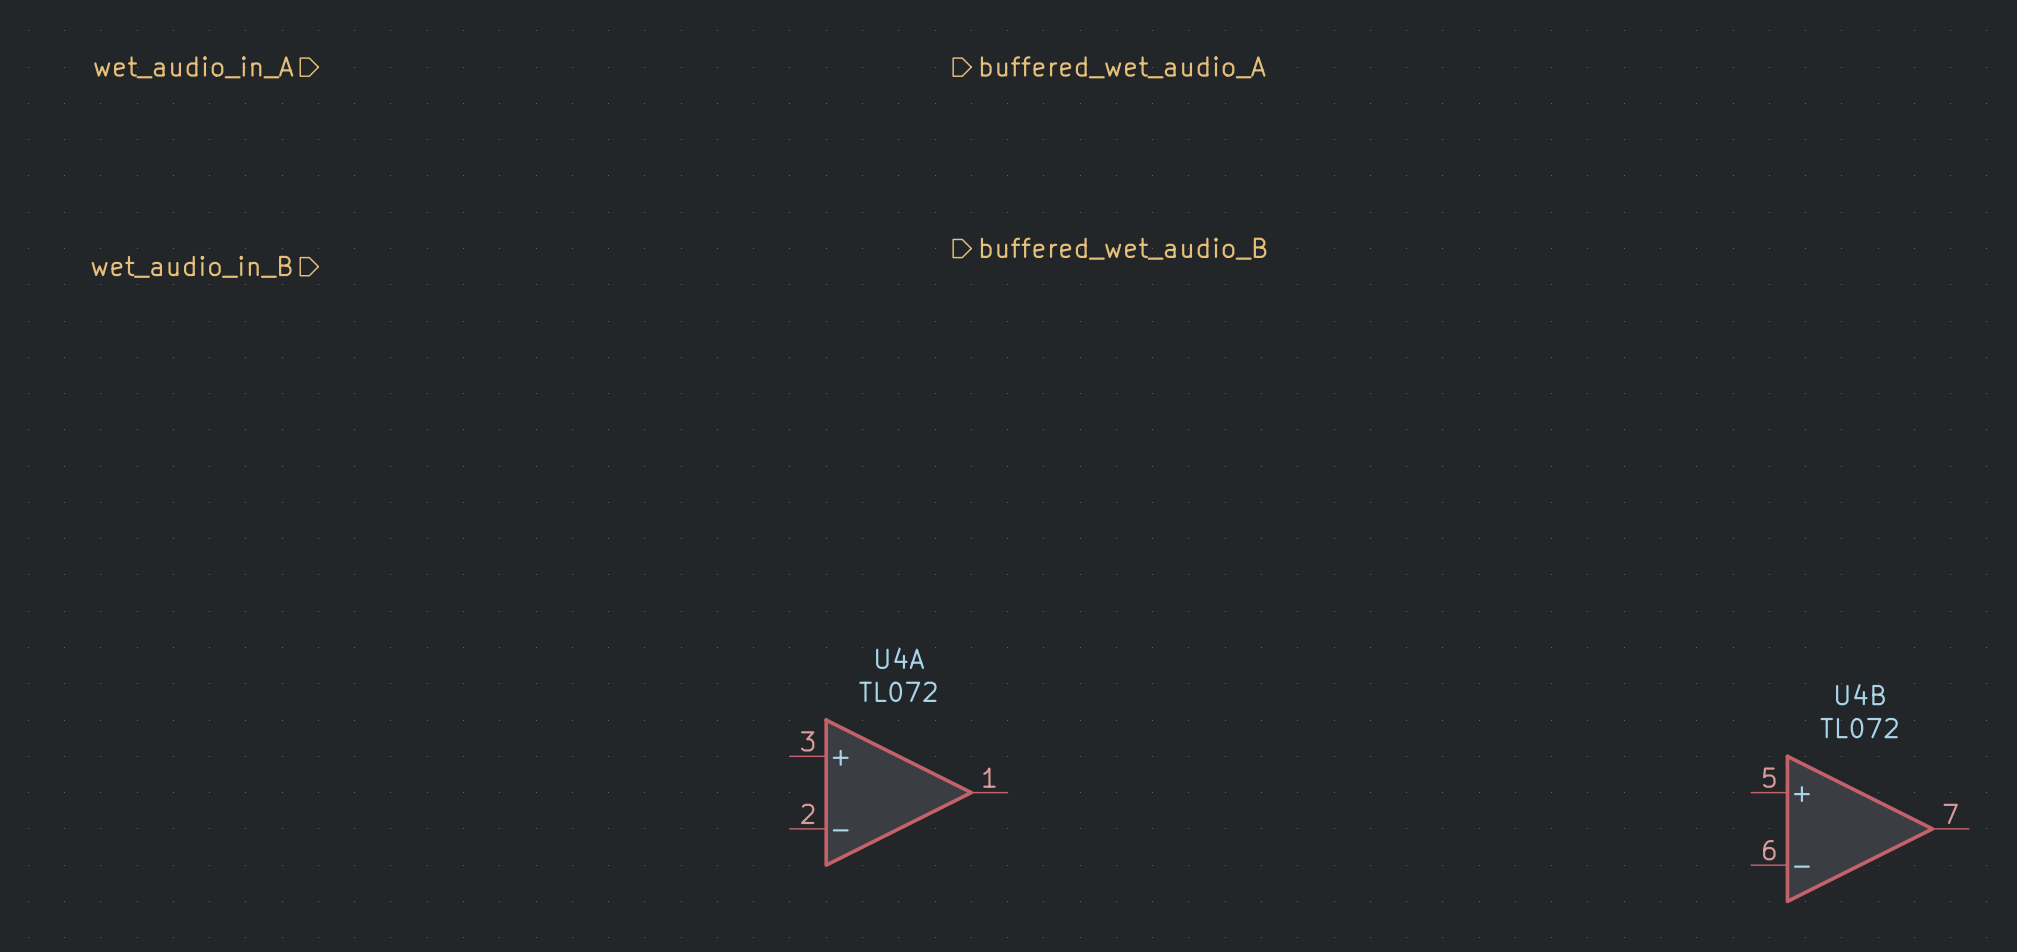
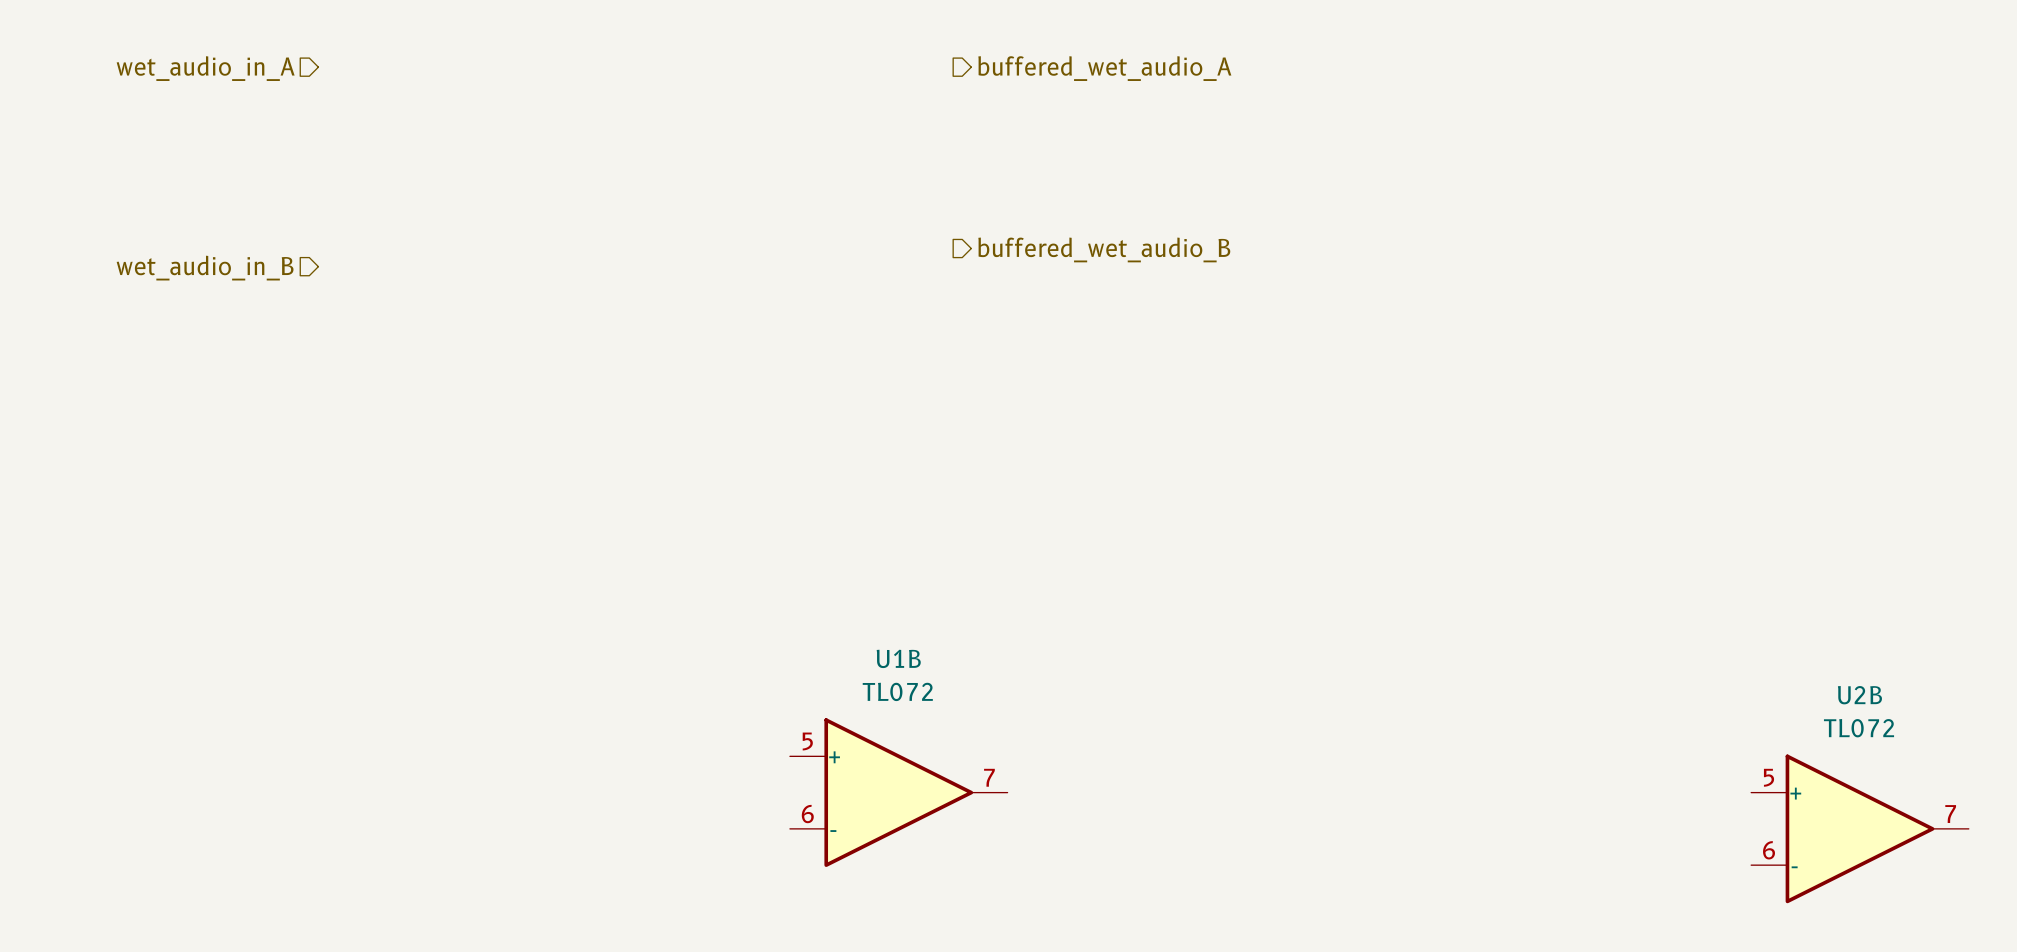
U4A name: U4A (900, 658) -> U1B (898, 658)
U4B name: U4B (1860, 694) -> U2B (1859, 695)
U4A pin number: 3 (807, 741) -> 5 (807, 741)
U4A pin number: 1 (989, 777) -> 7 (989, 777)
U4A pin number: 2 (807, 813) -> 6 (807, 814)

